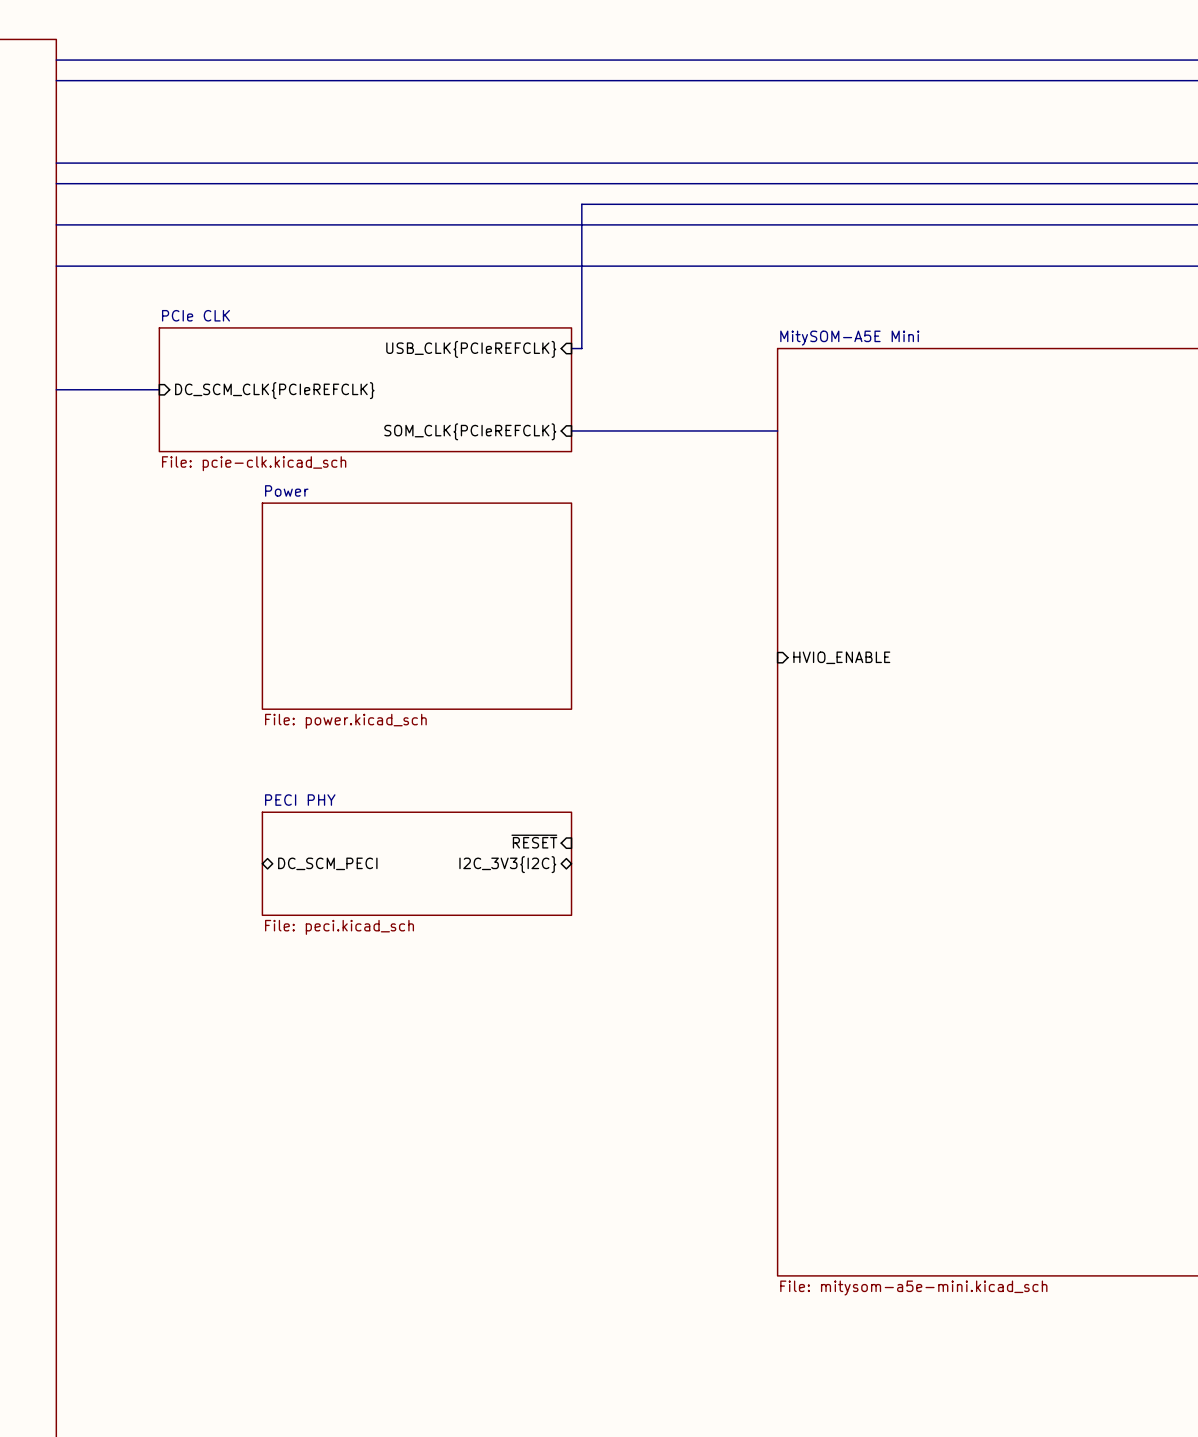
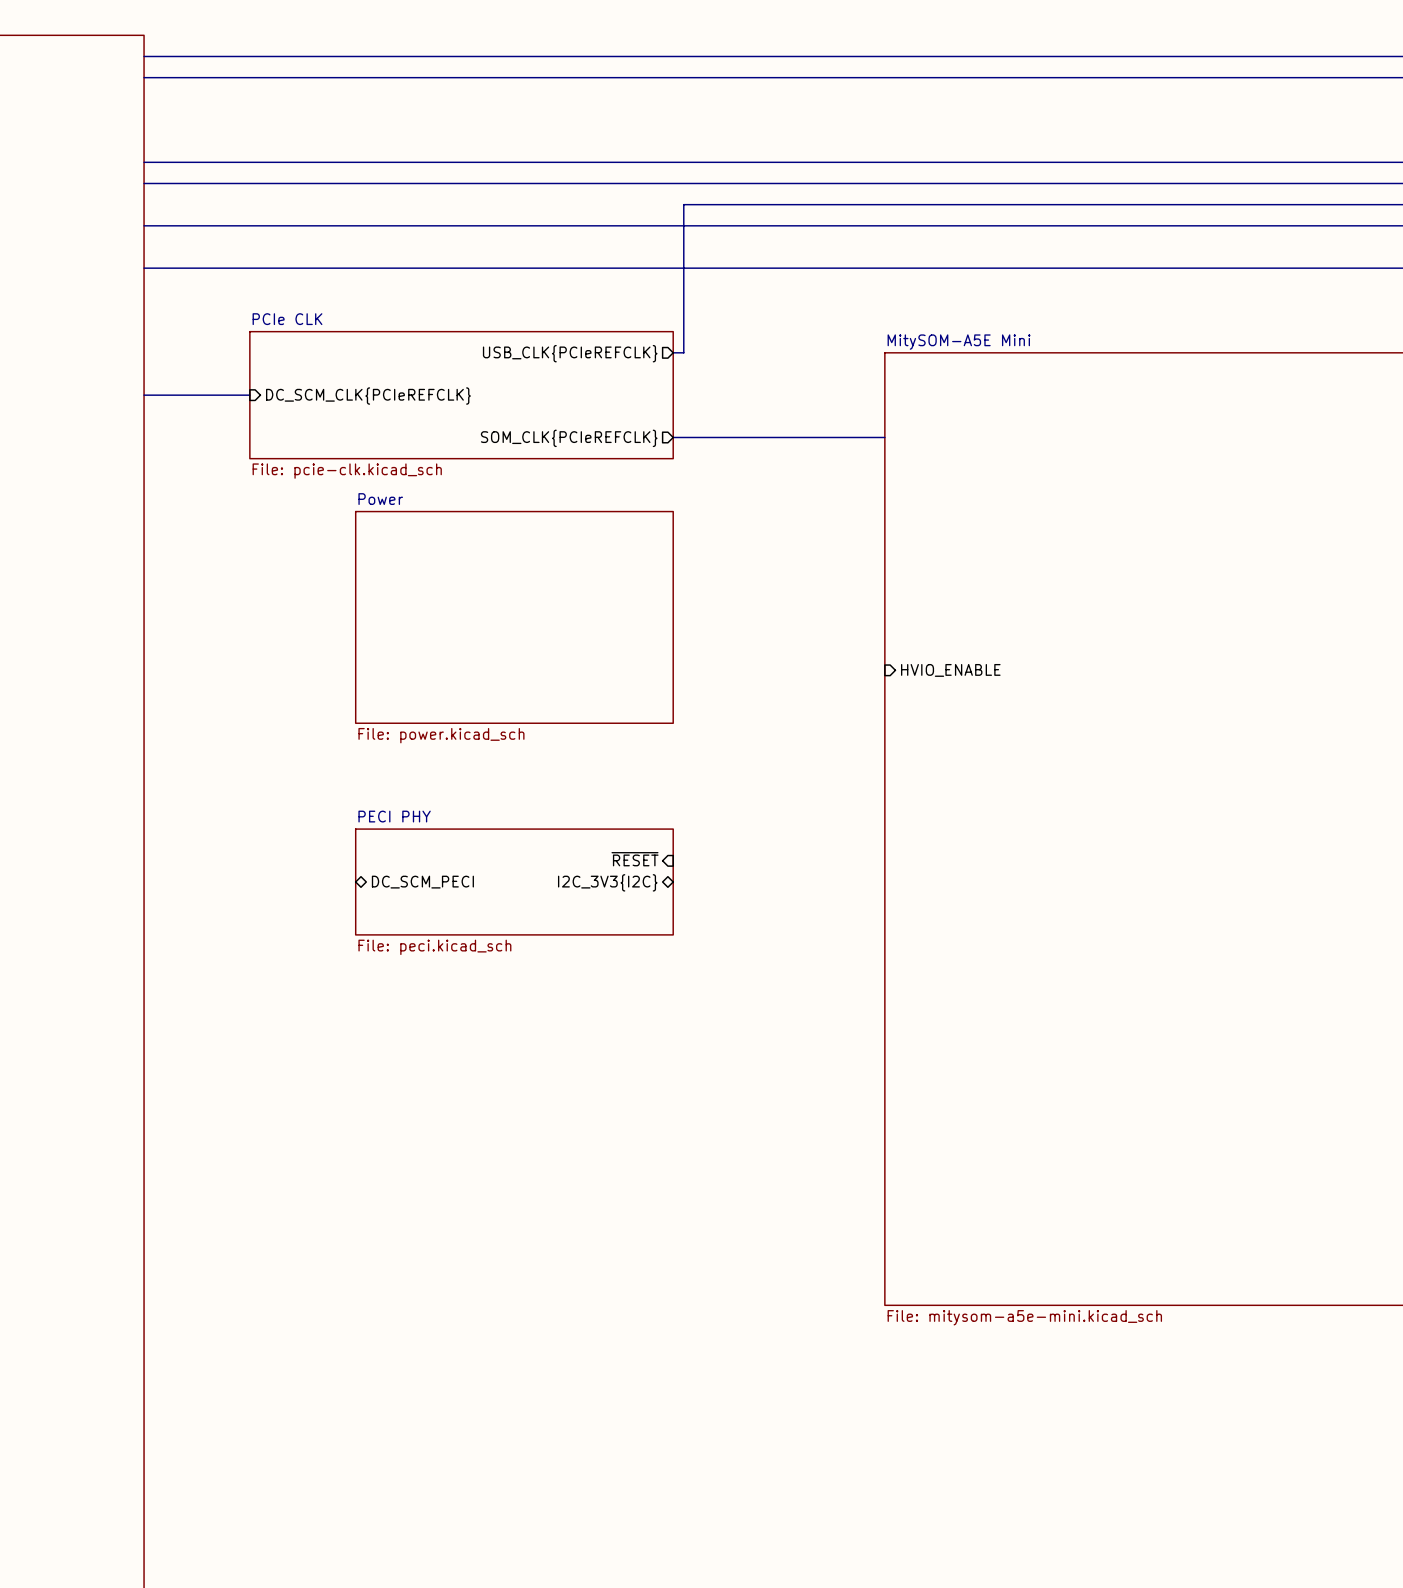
sheet pin shape: input (471, 349) -> output (570, 353)
sheet pin shape: input (470, 431) -> output (569, 438)

